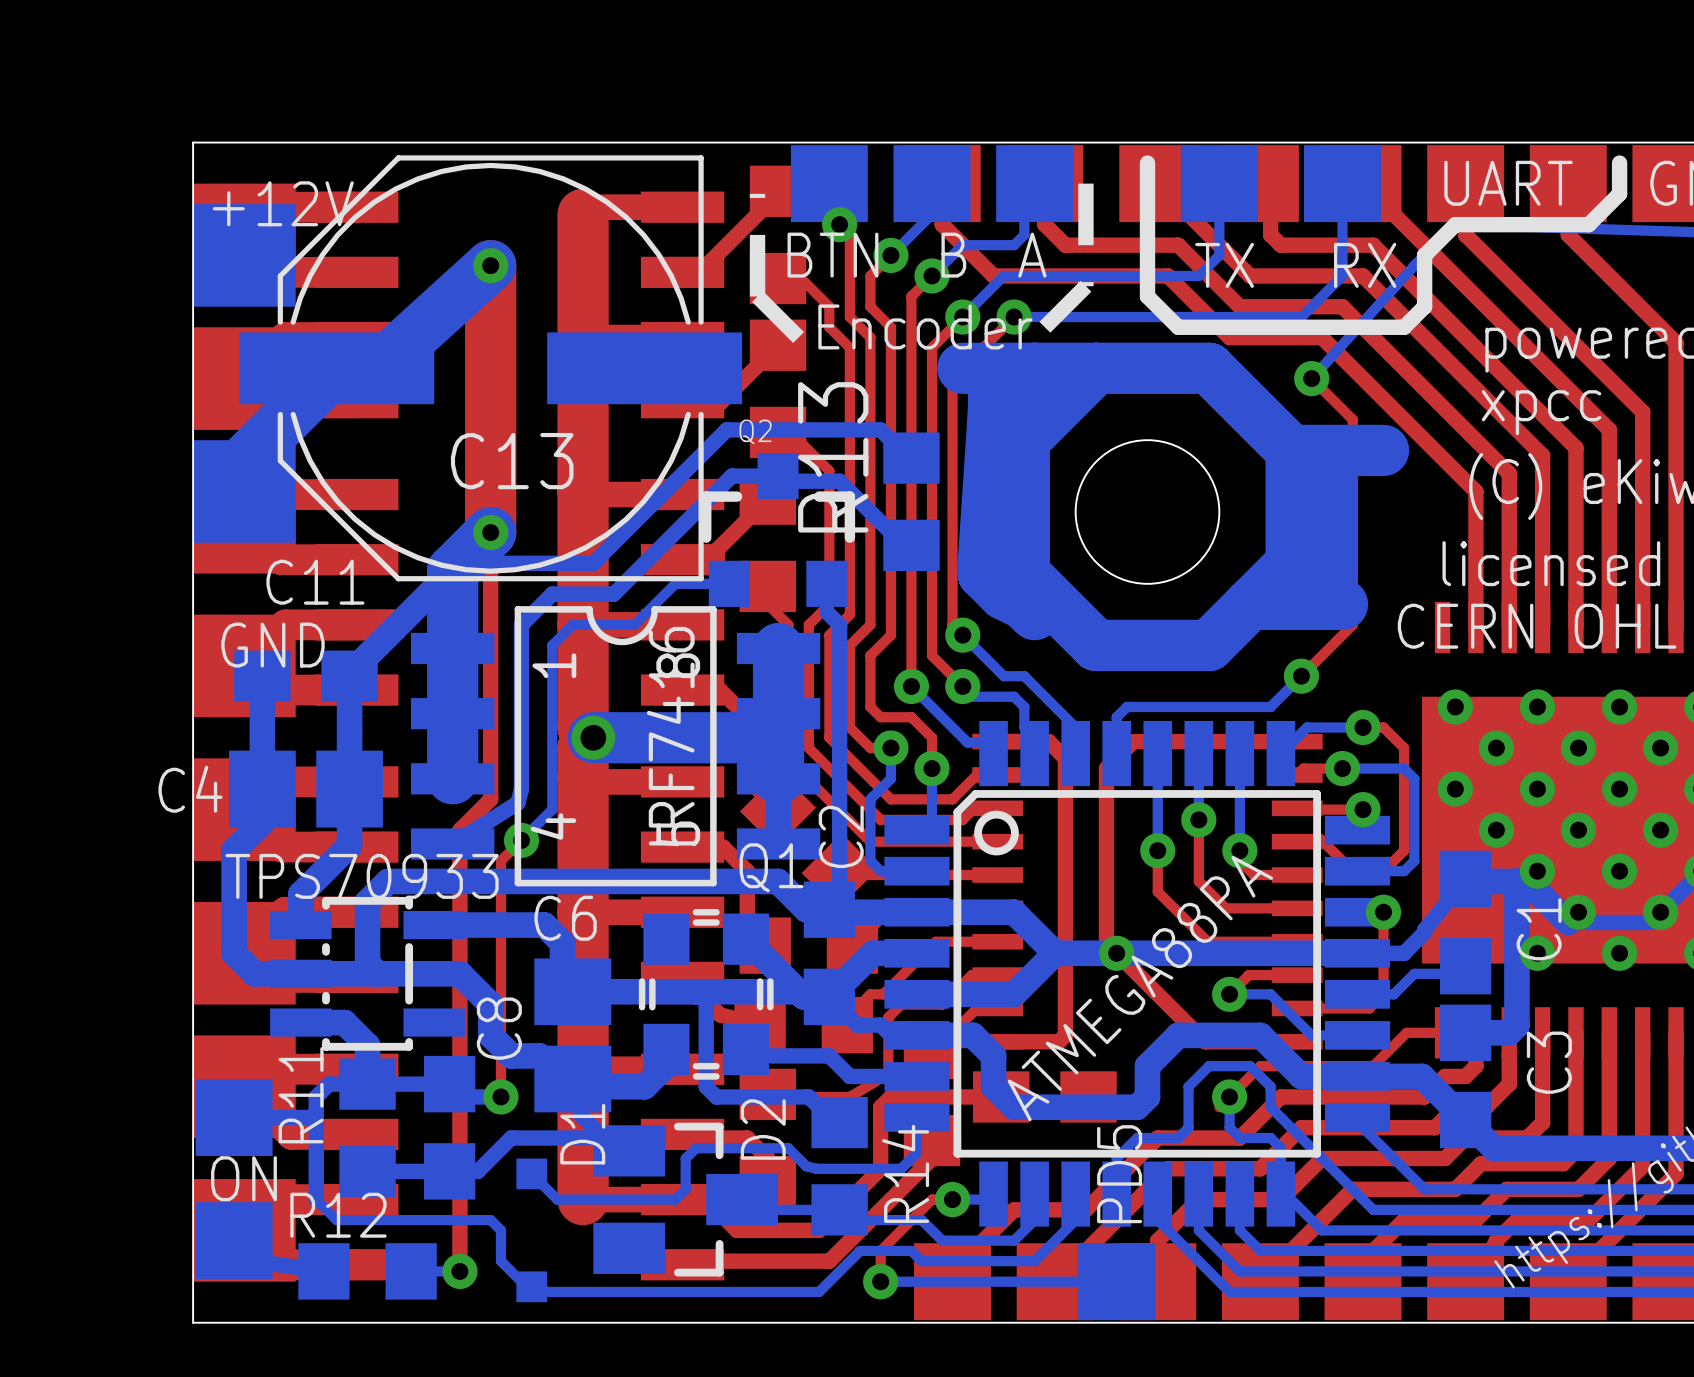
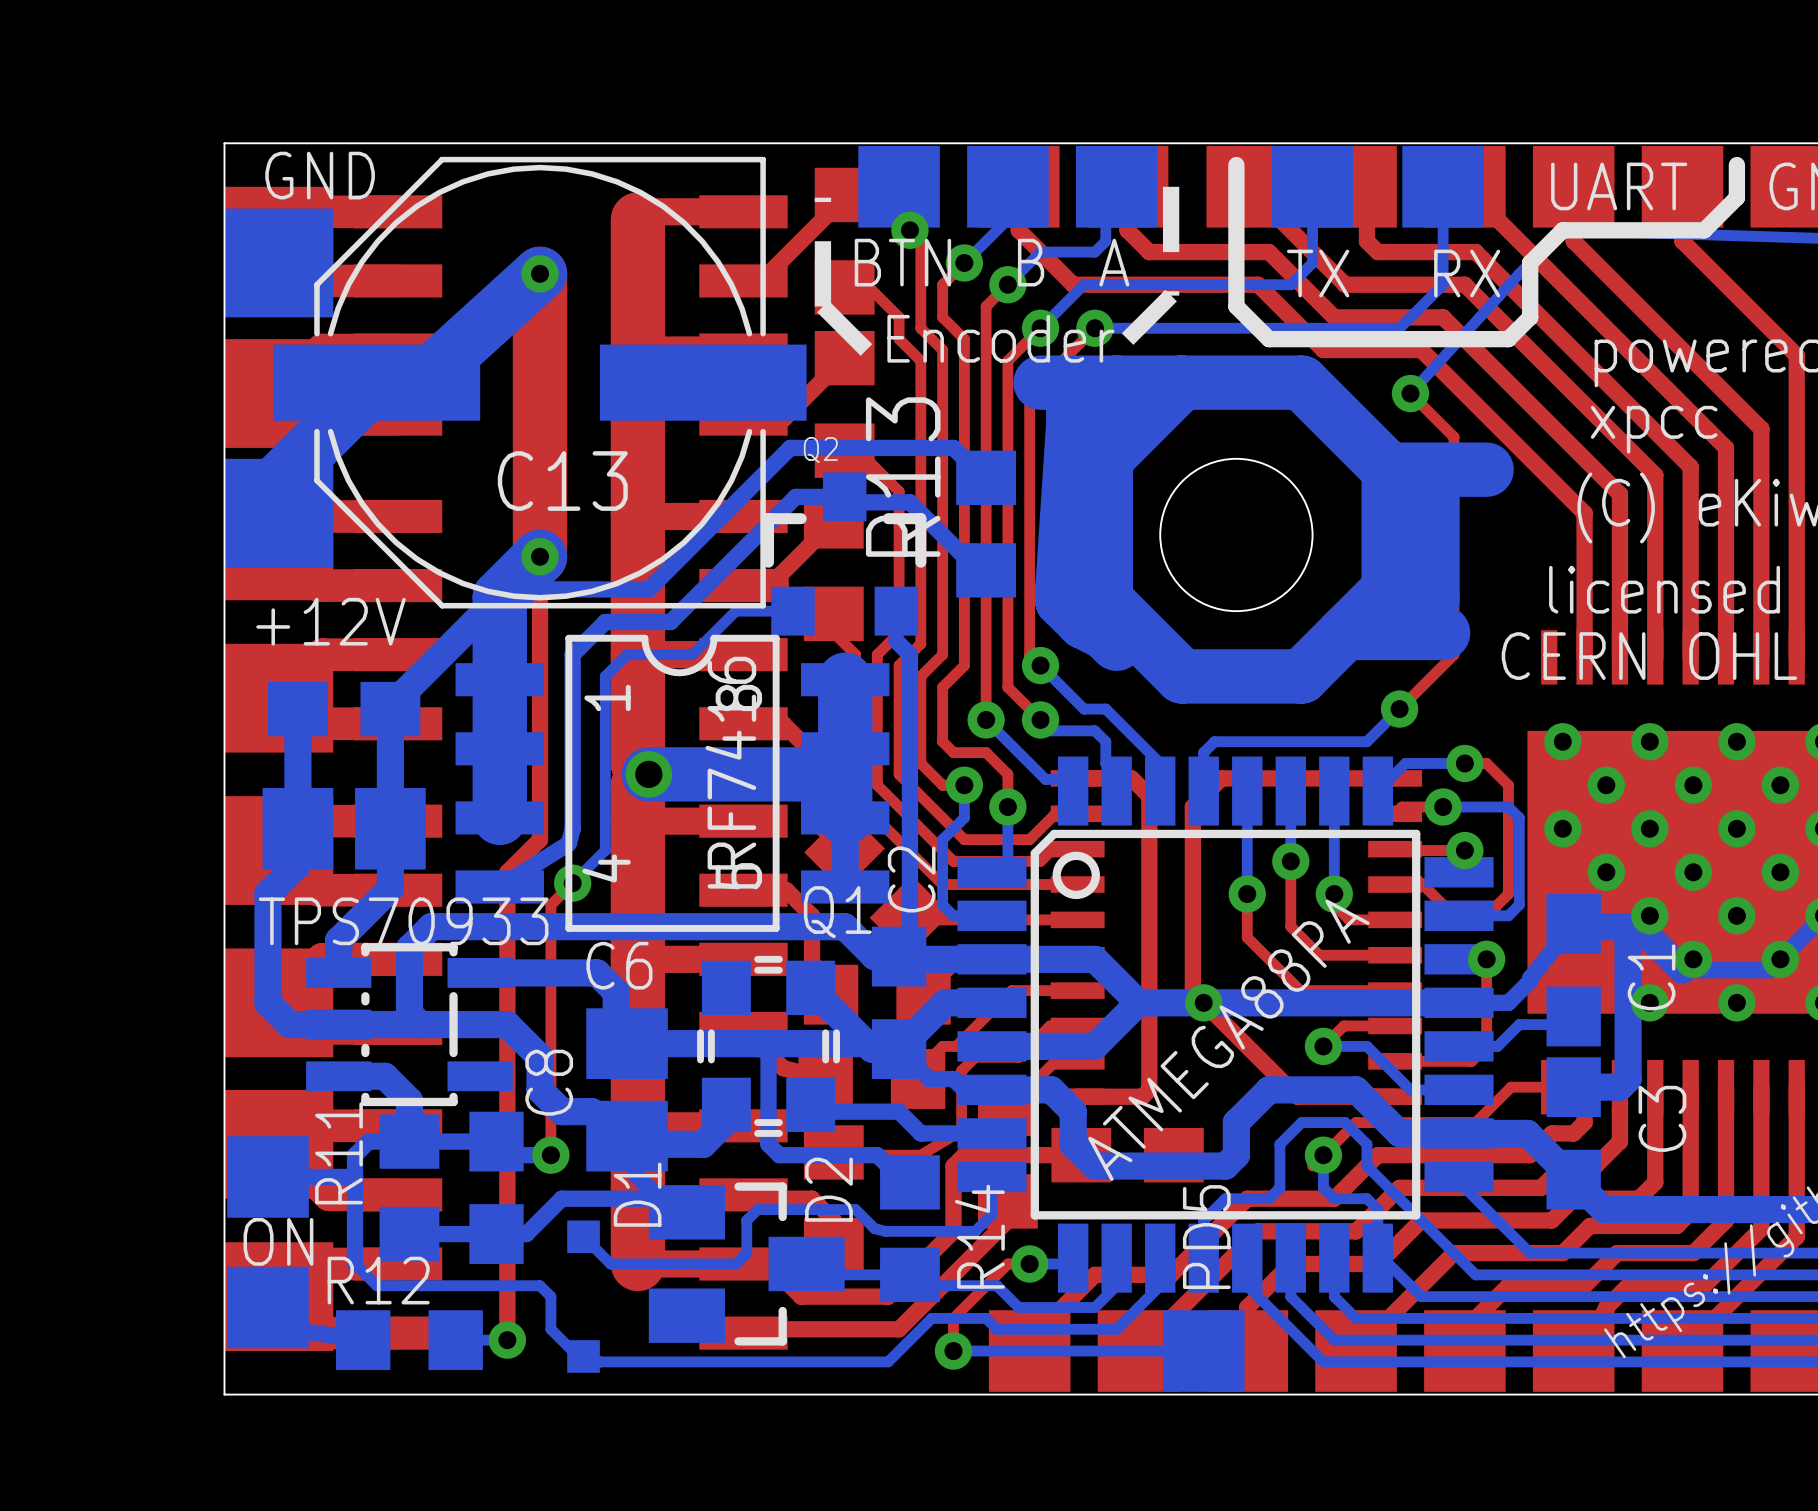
text position: +12V (283, 203) -> +12V (331, 621)
C11 name: C11 (315, 582) -> none
text position: GND (273, 645) -> GND (320, 175)
C4 name: C4 (190, 789) -> none

